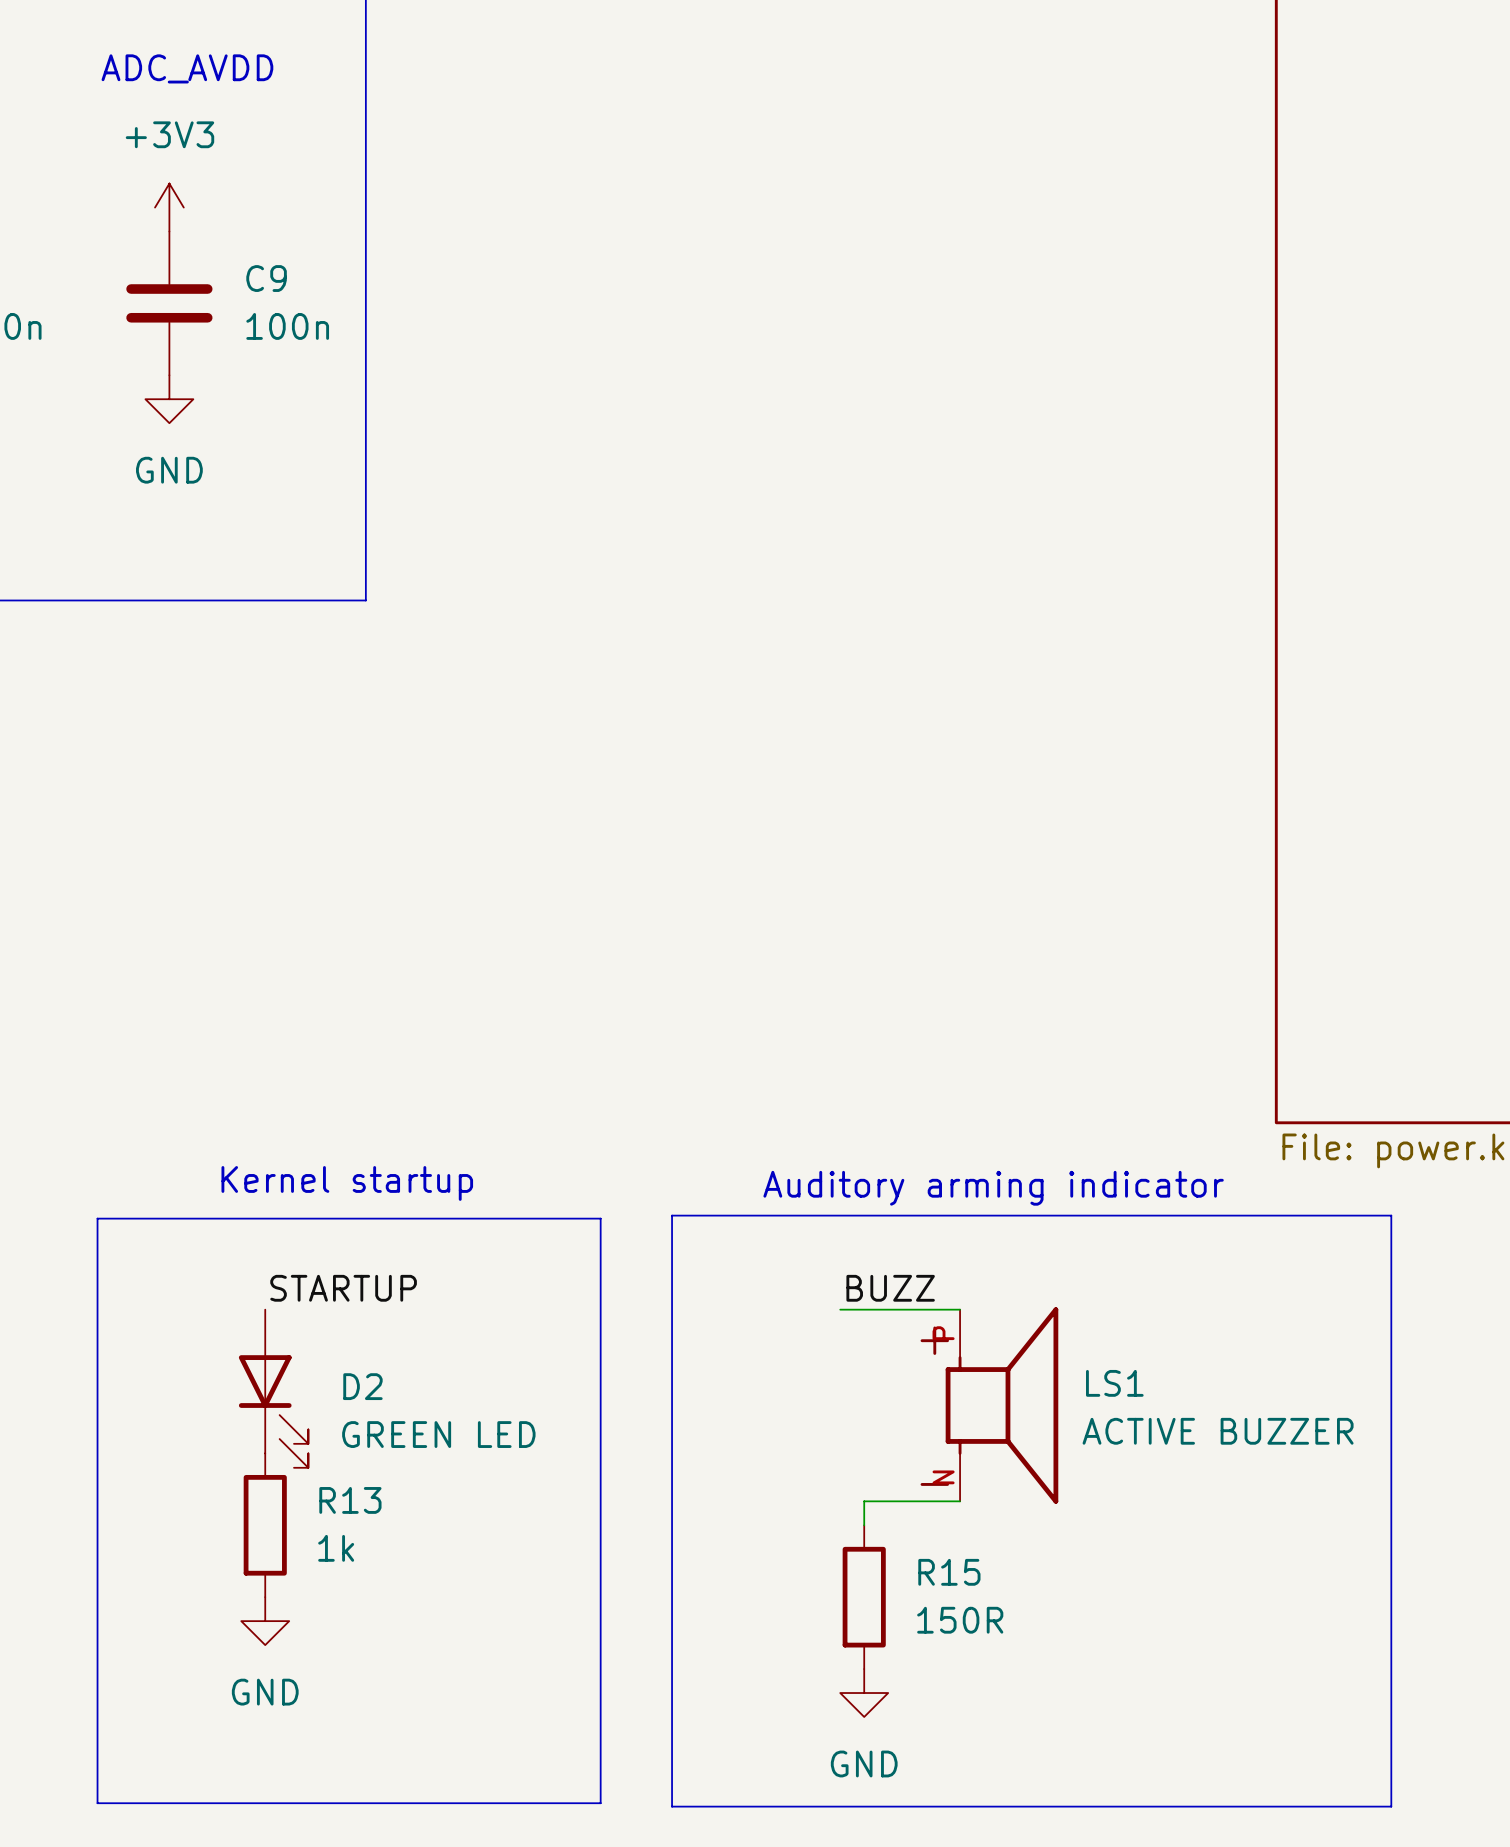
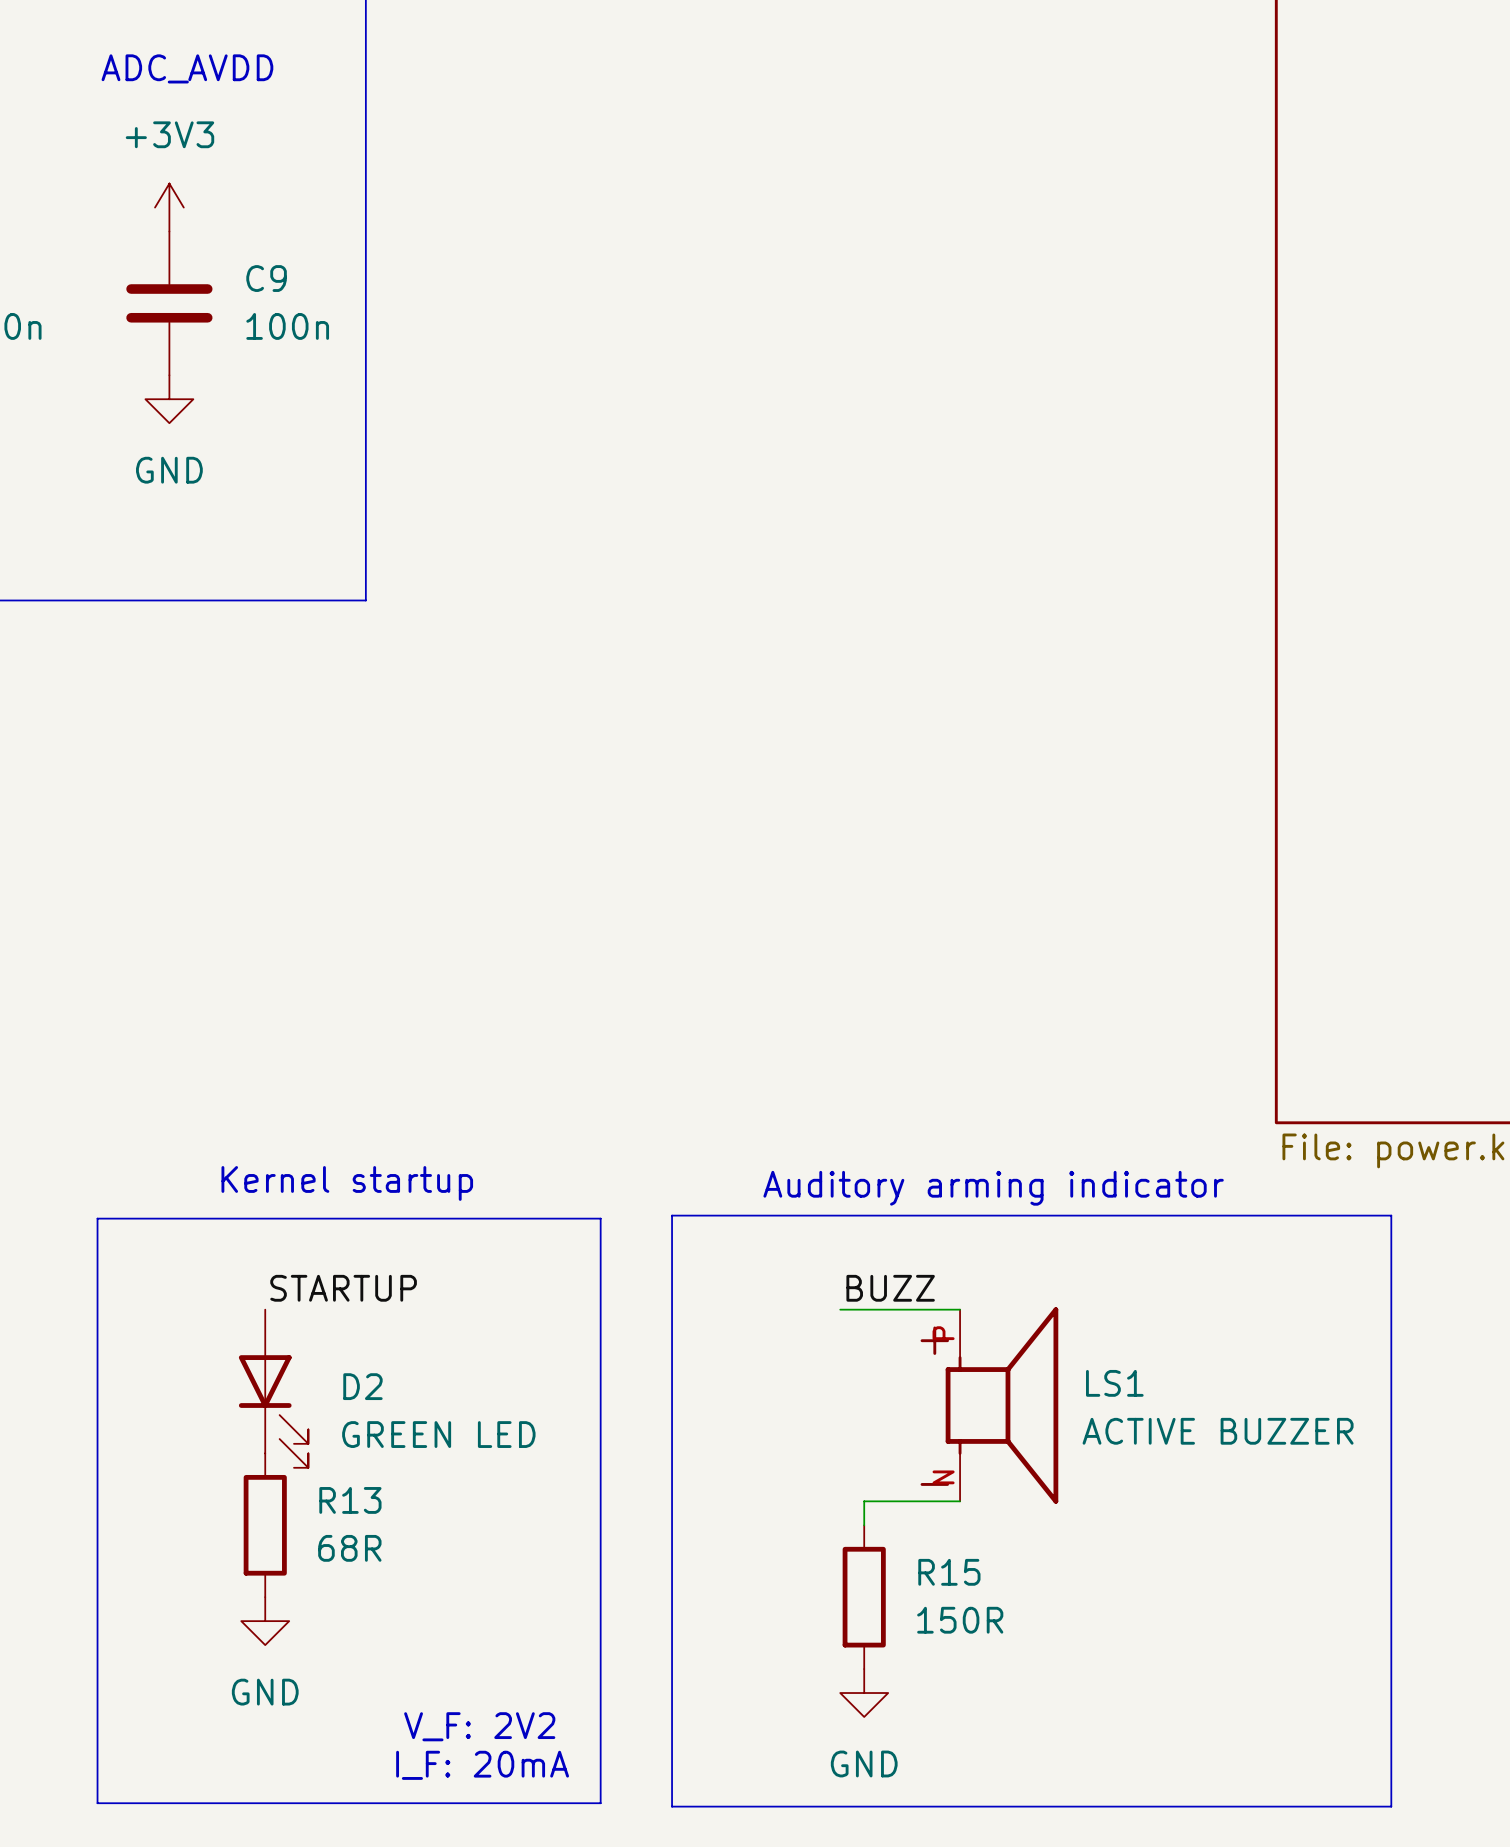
R13 value: 1k (336, 1548) -> 68R (349, 1548)
text: none -> V_F: 2V2 (479, 1726)
text: none -> I_F: 20mA (482, 1765)

